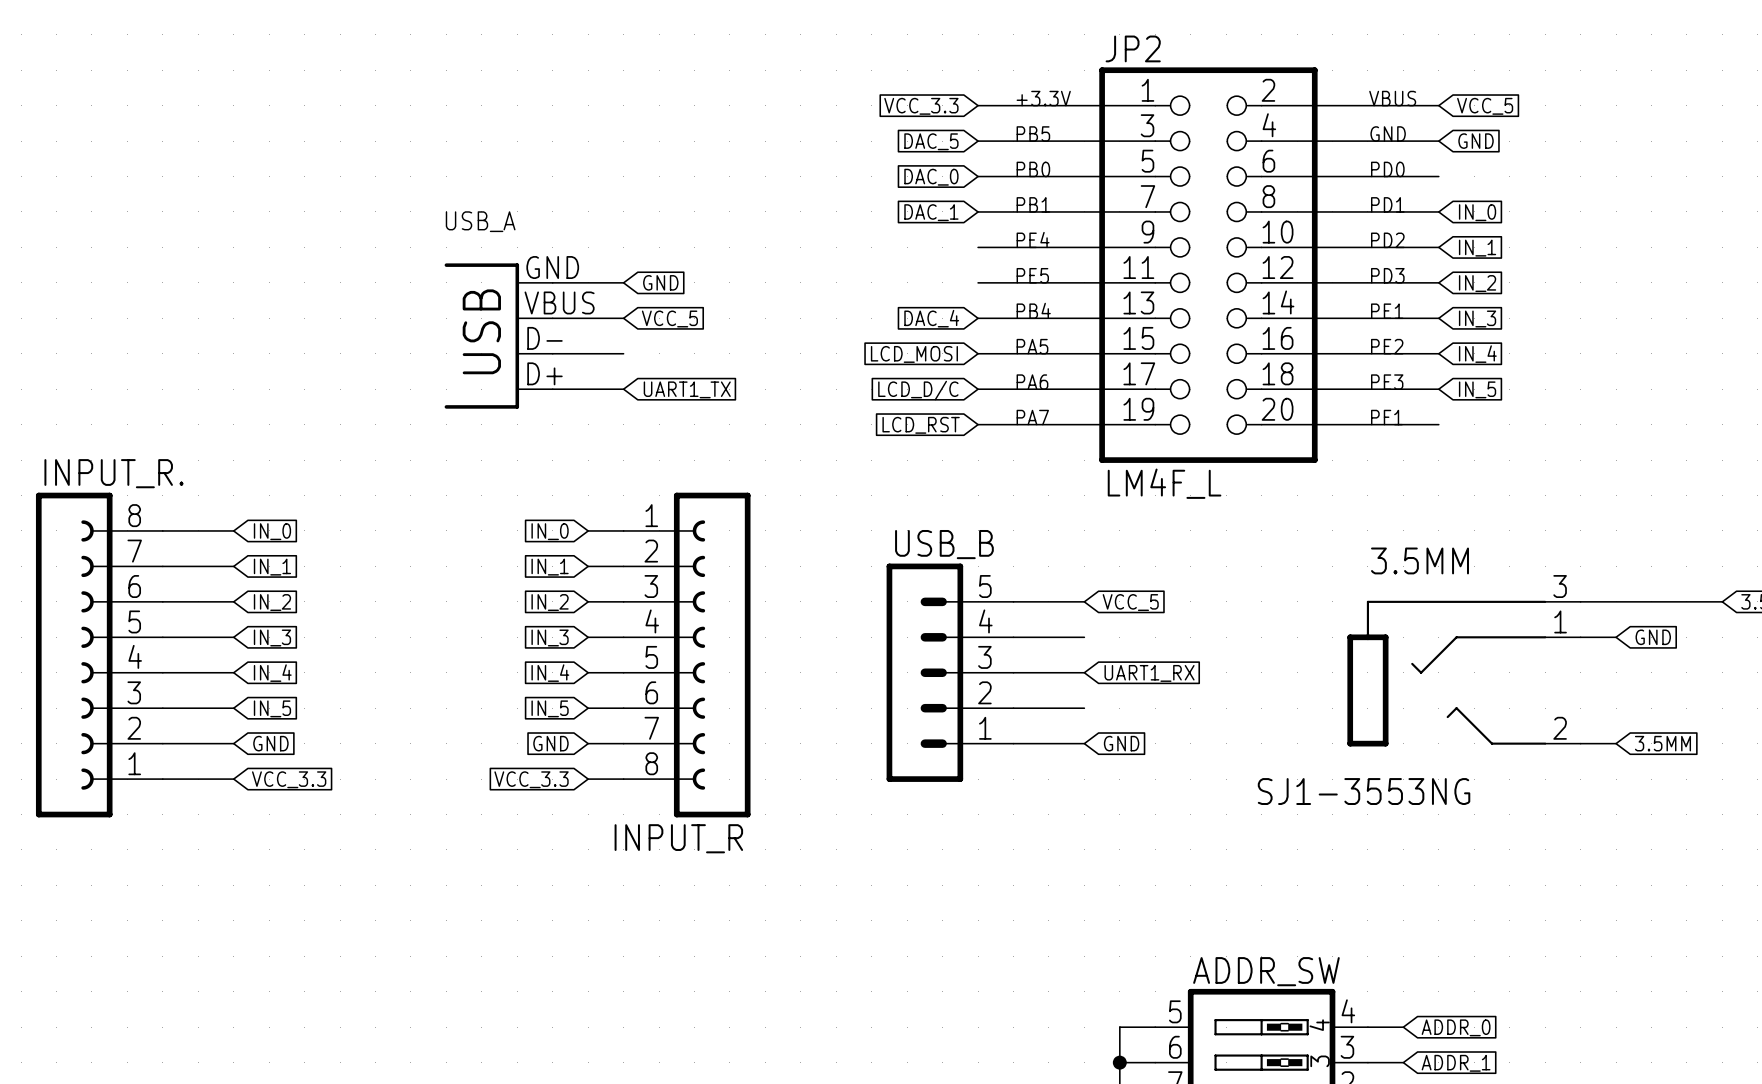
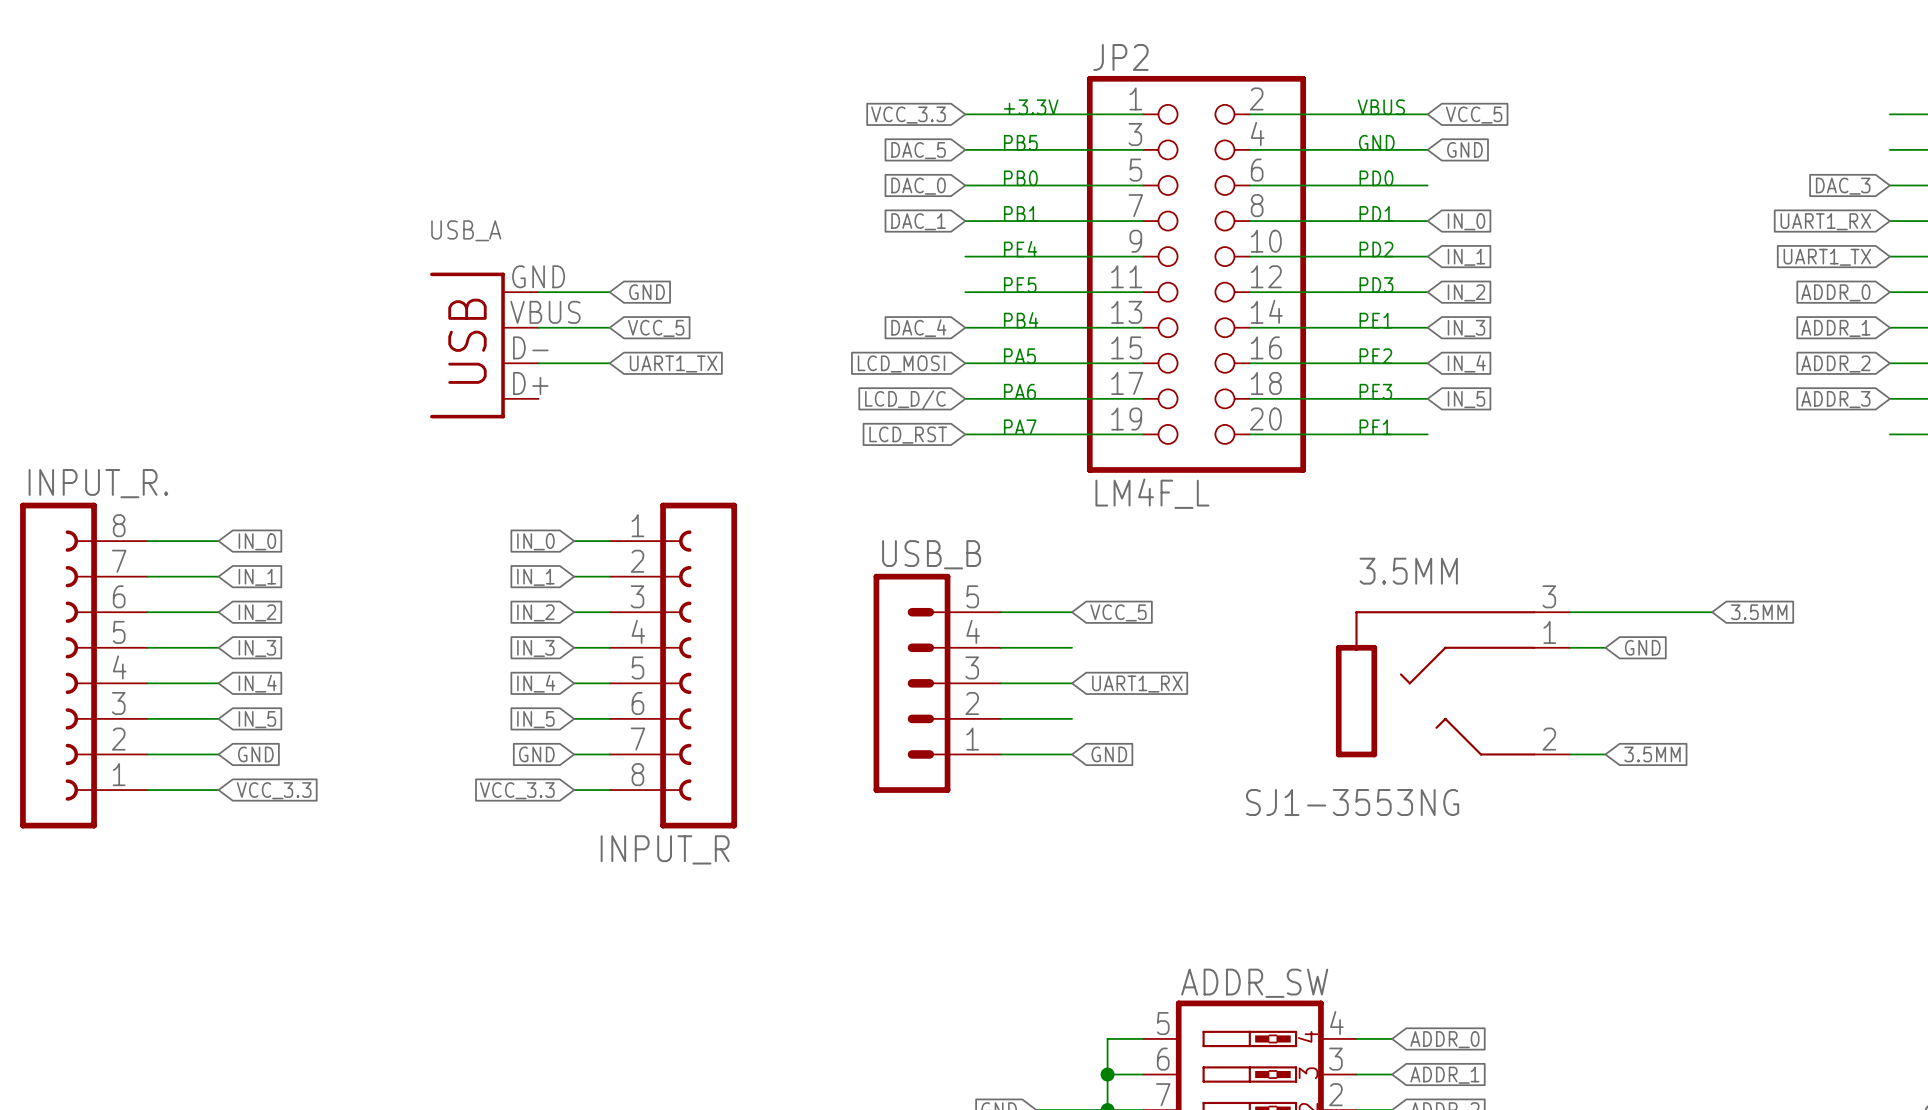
wire: (552, 389) (623, 389) -> none
global label position: UART1_TX (687, 389) -> UART1_TX (673, 363)

